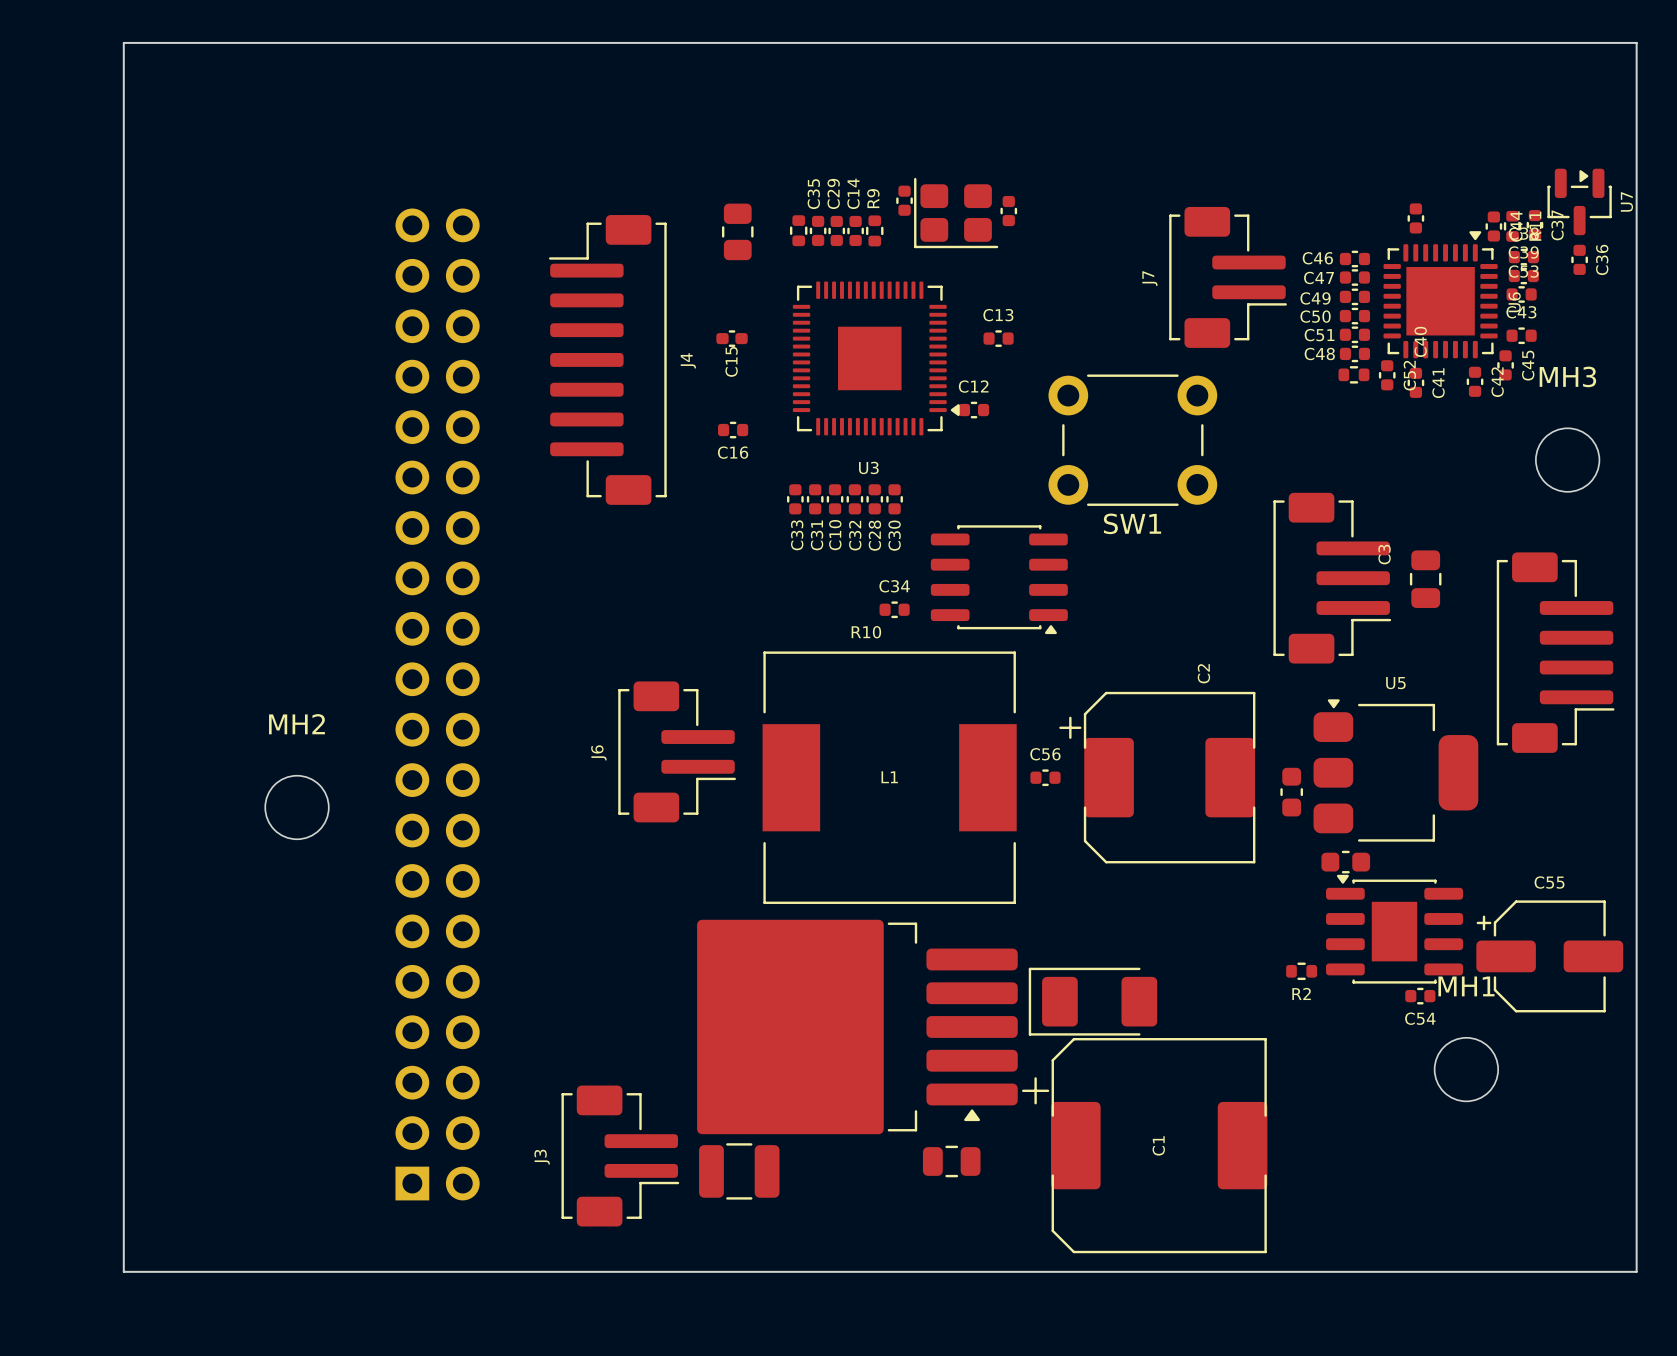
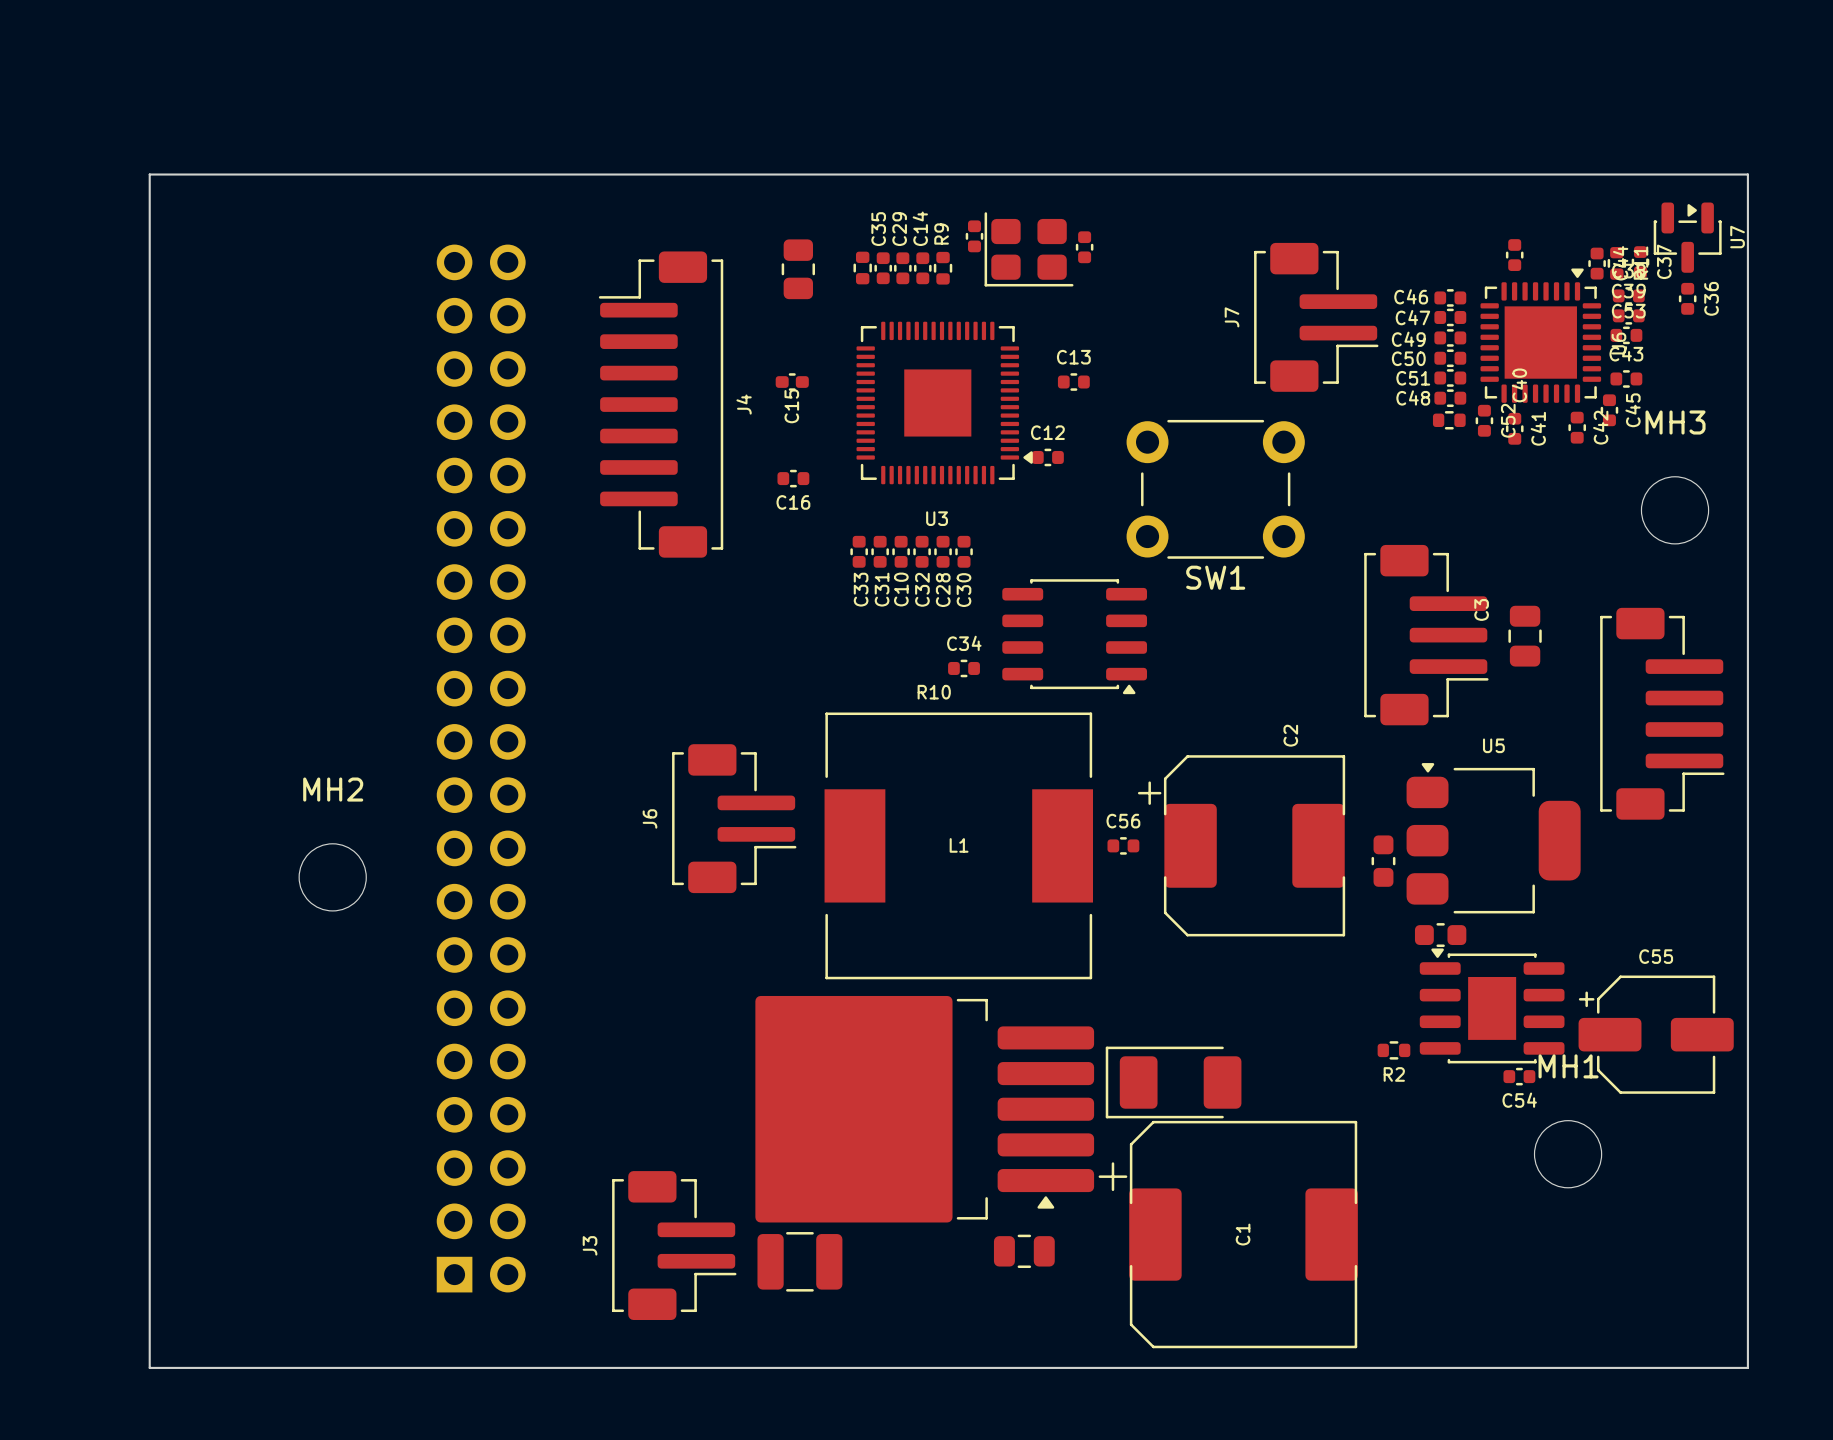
board edge: (123, 142) (123, 42) (1636, 42) (1636, 142) -> (149, 174) (1747, 174)

